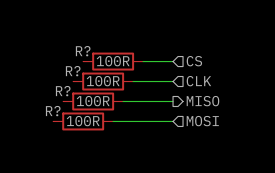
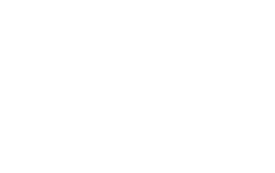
R?: 100R (113, 61) -> none
wire: (143, 61) (173, 61) -> none
hierarchical label: CS (194, 61) -> none
R?: 100R (103, 81) -> none
wire: (133, 81) (173, 81) -> none
hierarchical label: CLK (198, 81) -> none
R?: 100R (93, 101) -> none
wire: (123, 101) (173, 101) -> none
hierarchical label: MISO (202, 101) -> none
R?: 100R (83, 121) -> none
wire: (113, 121) (173, 121) -> none
hierarchical label: MOSI (202, 121) -> none

